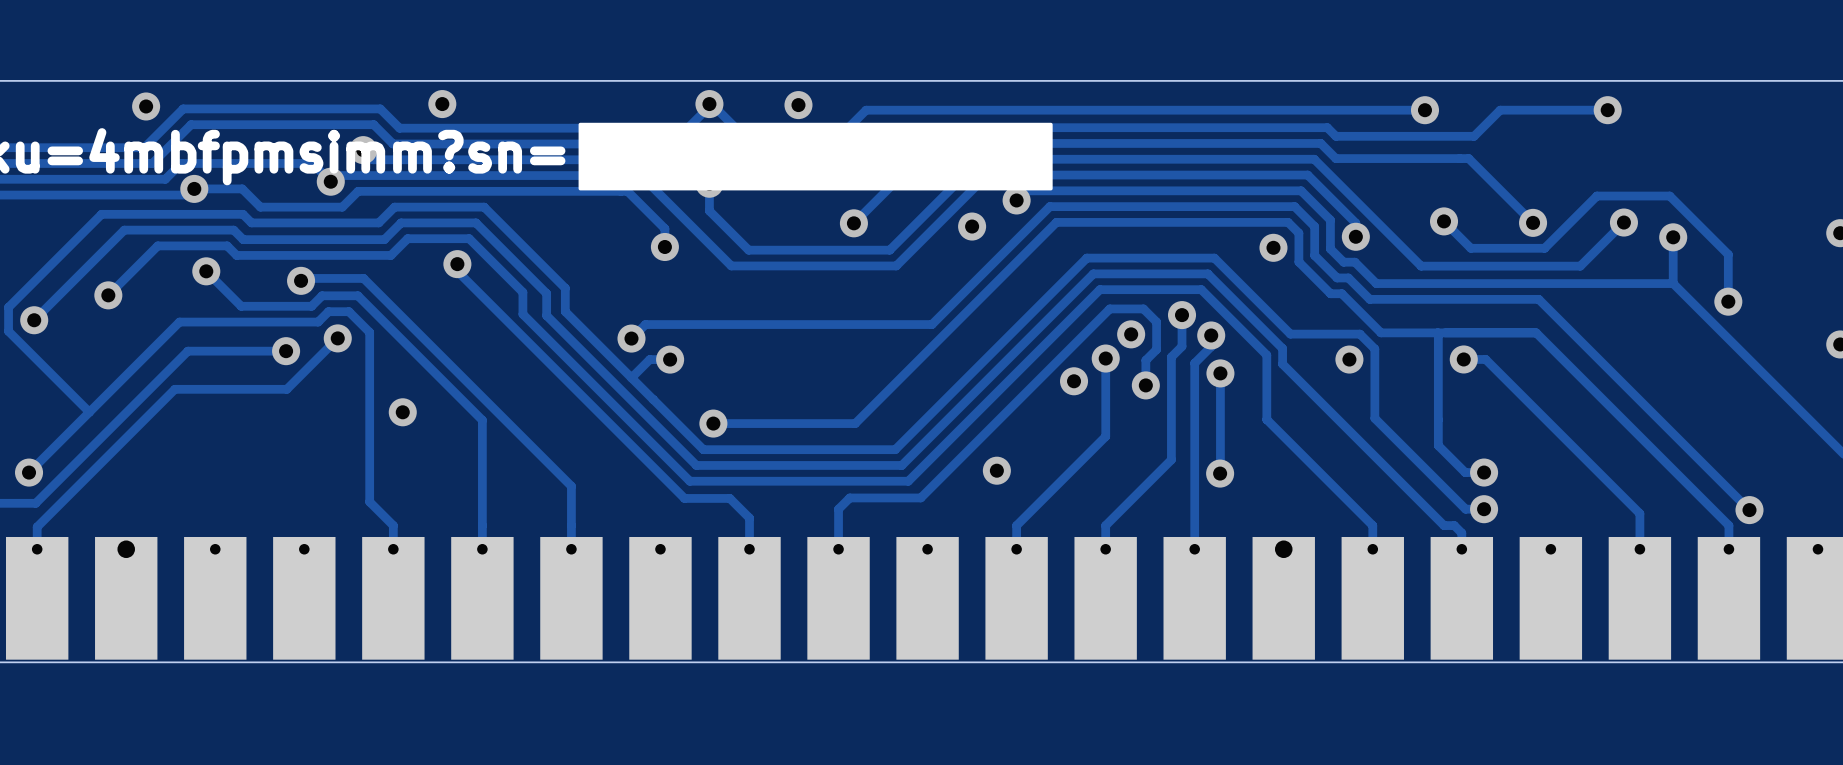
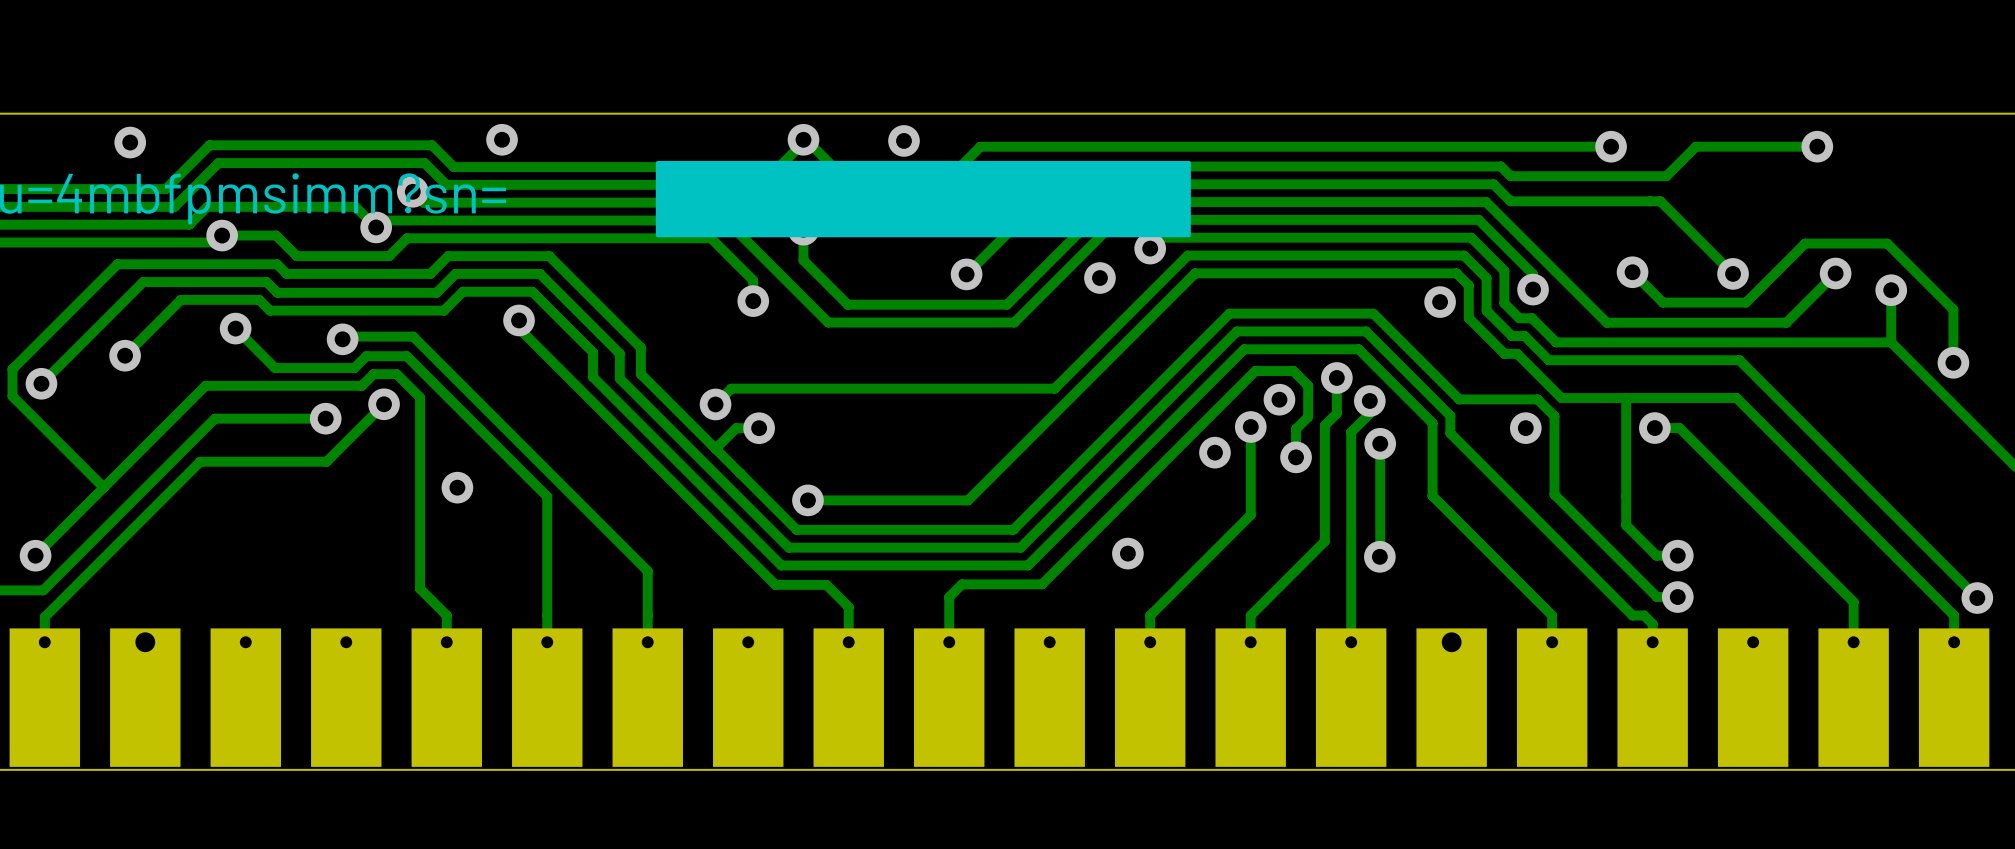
via position: (146, 106) -> (130, 142)

